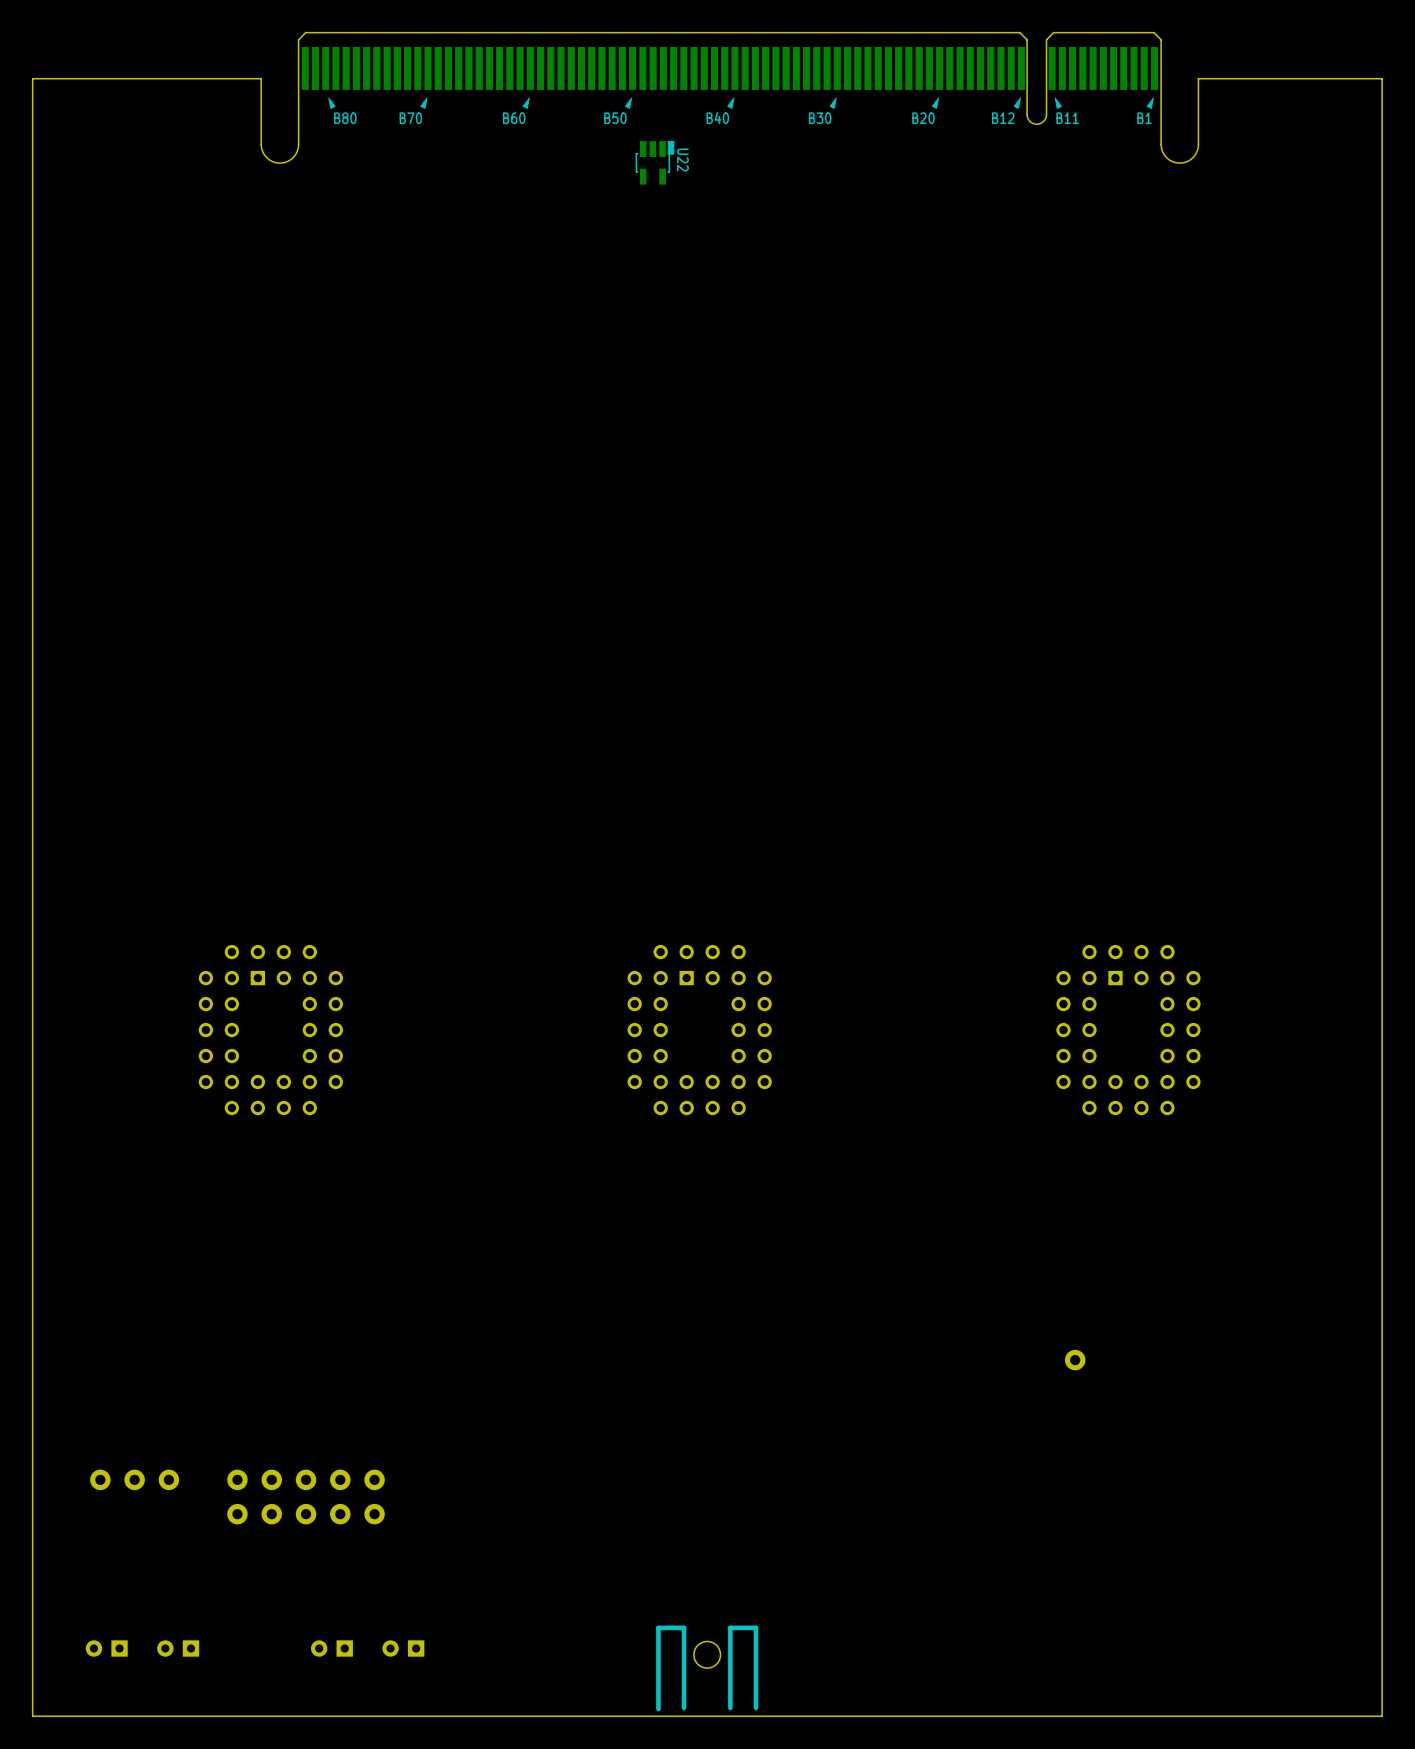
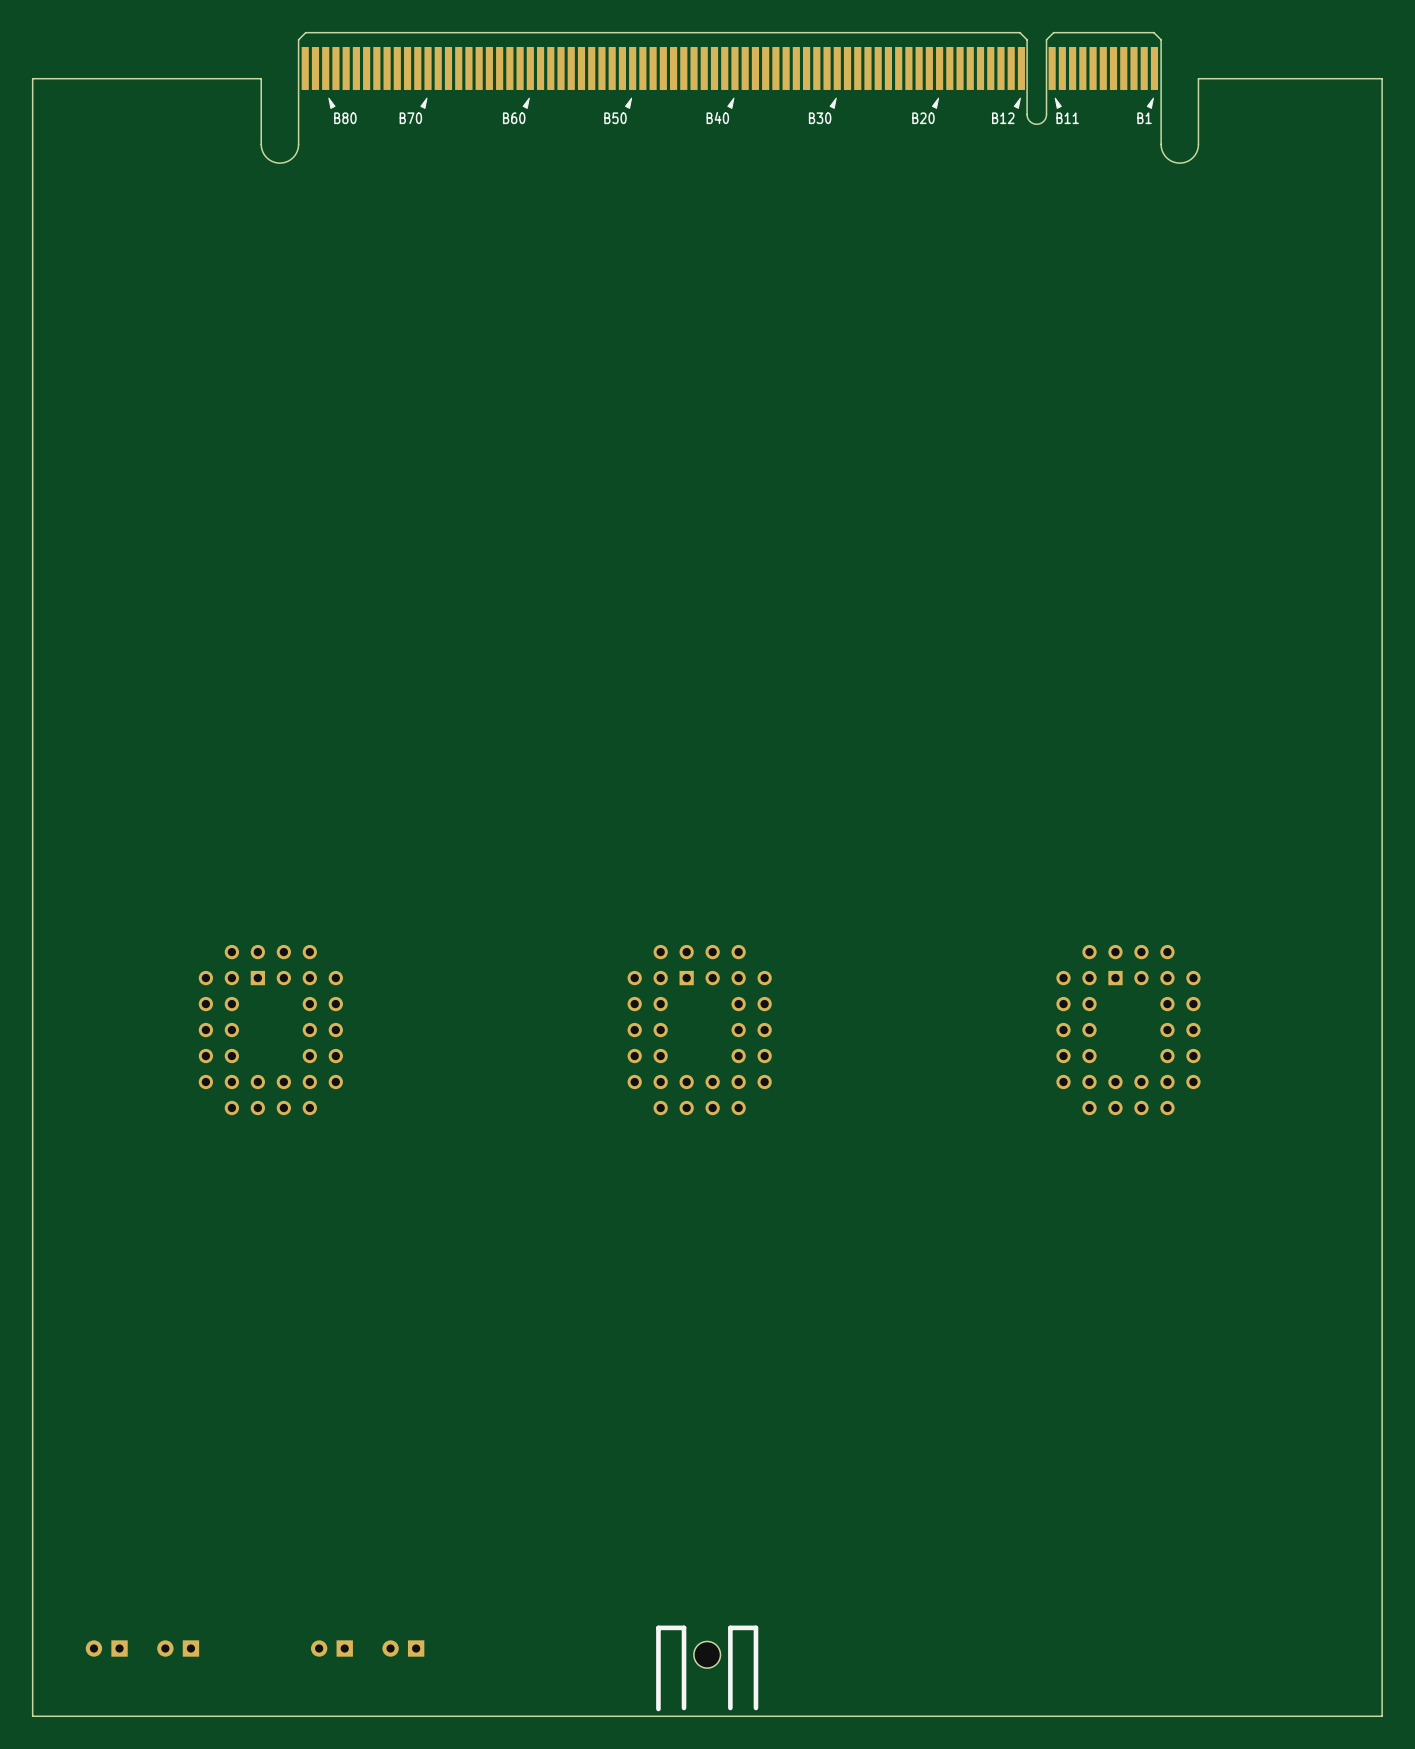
U22: (655, 162) -> none
part: (1075, 1360) -> none
part: (100, 1479) -> none
part: (134, 1479) -> none
part: (168, 1479) -> none
part: (237, 1479) -> none
part: (271, 1479) -> none
part: (306, 1479) -> none
part: (340, 1479) -> none
part: (374, 1479) -> none
part: (237, 1514) -> none
part: (271, 1514) -> none
part: (306, 1514) -> none
part: (340, 1514) -> none
part: (374, 1514) -> none

